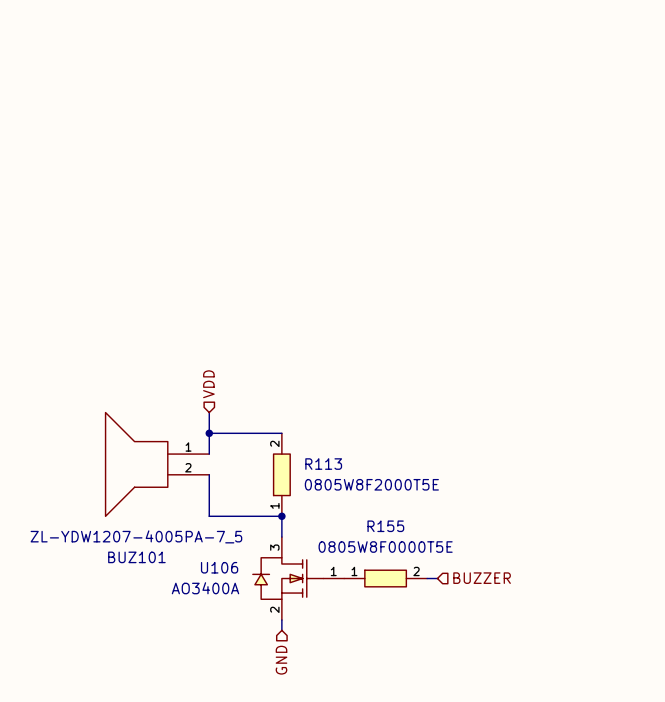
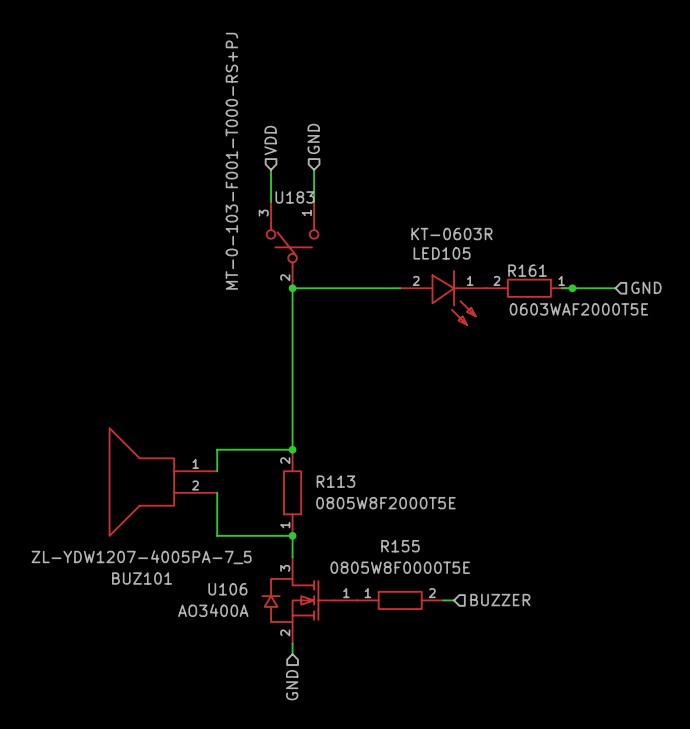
hierarchical label: none -> GND (313, 138)
hierarchical label: none -> VDD (270, 140)
wire: none -> (271, 169) (271, 202)
wire: none -> (314, 169) (314, 202)
U183: none -> MT-0-103-F001-T000-RS+PJ (292, 245)
junction: none -> (292, 288)
wire: none -> (400, 288) (292, 288) (292, 449)
R161: none -> 0603WAF2000T5E (529, 288)
wire: none -> (561, 288) (615, 288)
junction: none -> (572, 288)
hierarchical label: none -> GND (646, 287)
LED105: none -> KT-0603R (443, 297)
hierarchical label: VDD (208, 384) -> none
wire: (209, 412) (209, 433) -> none
junction: (209, 433) -> none
junction: none -> (292, 449)

